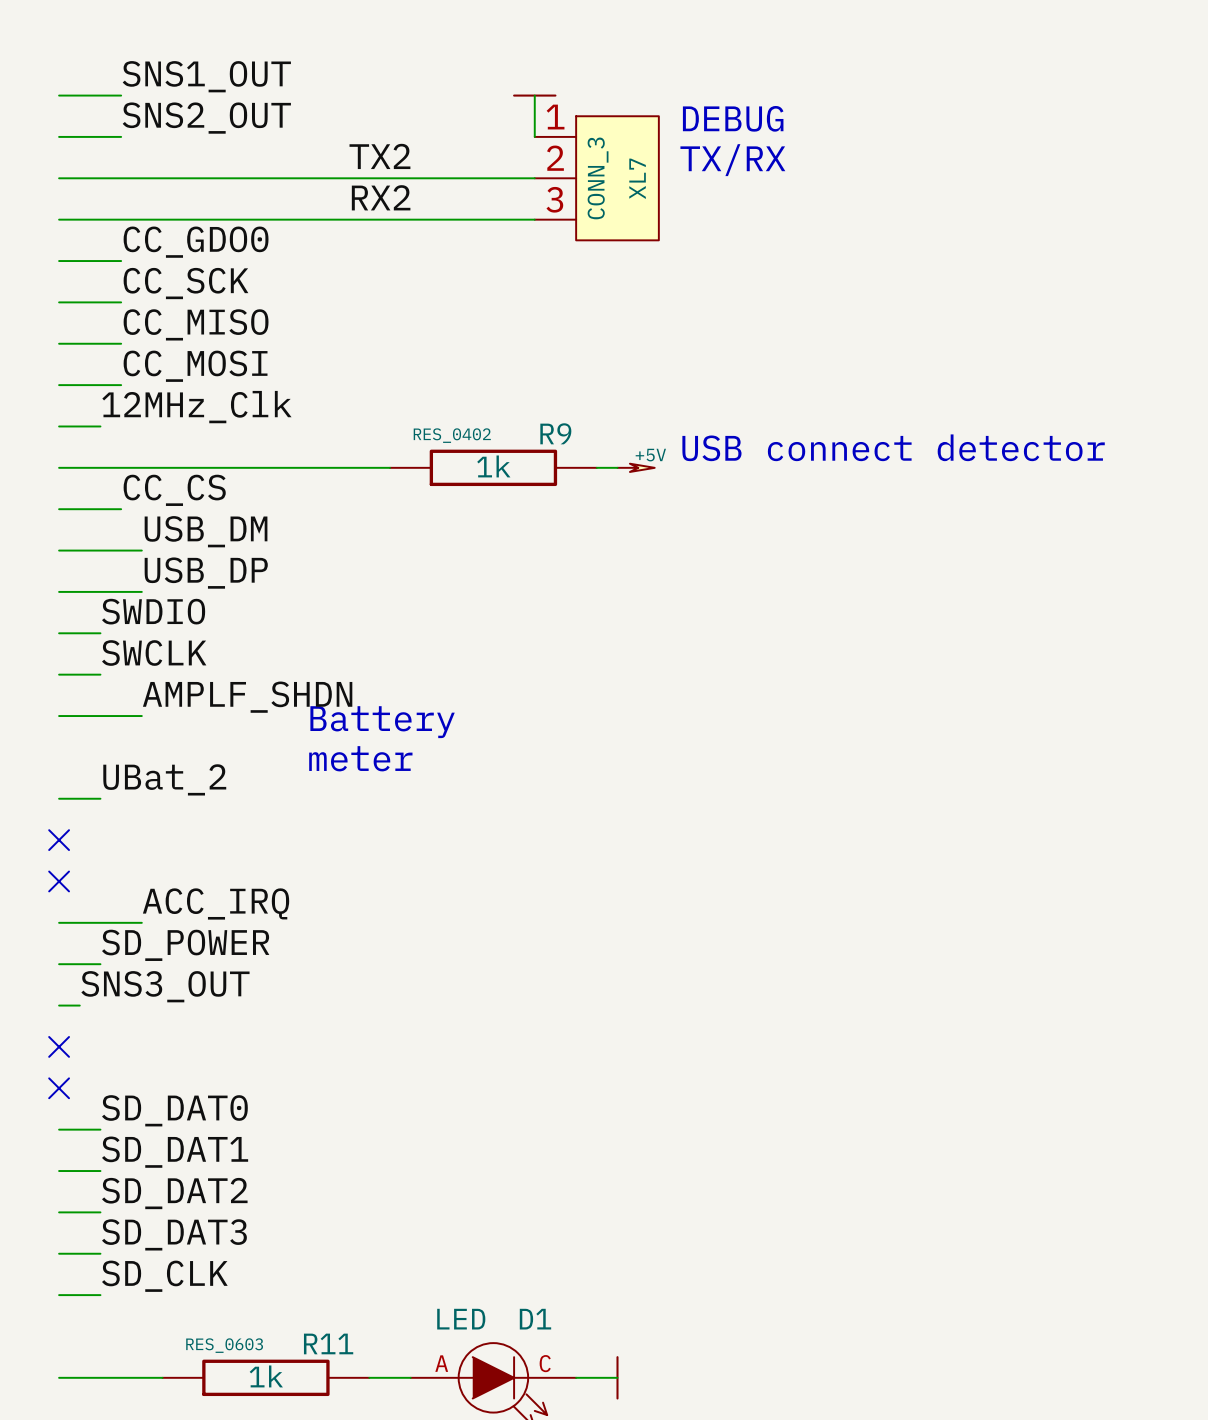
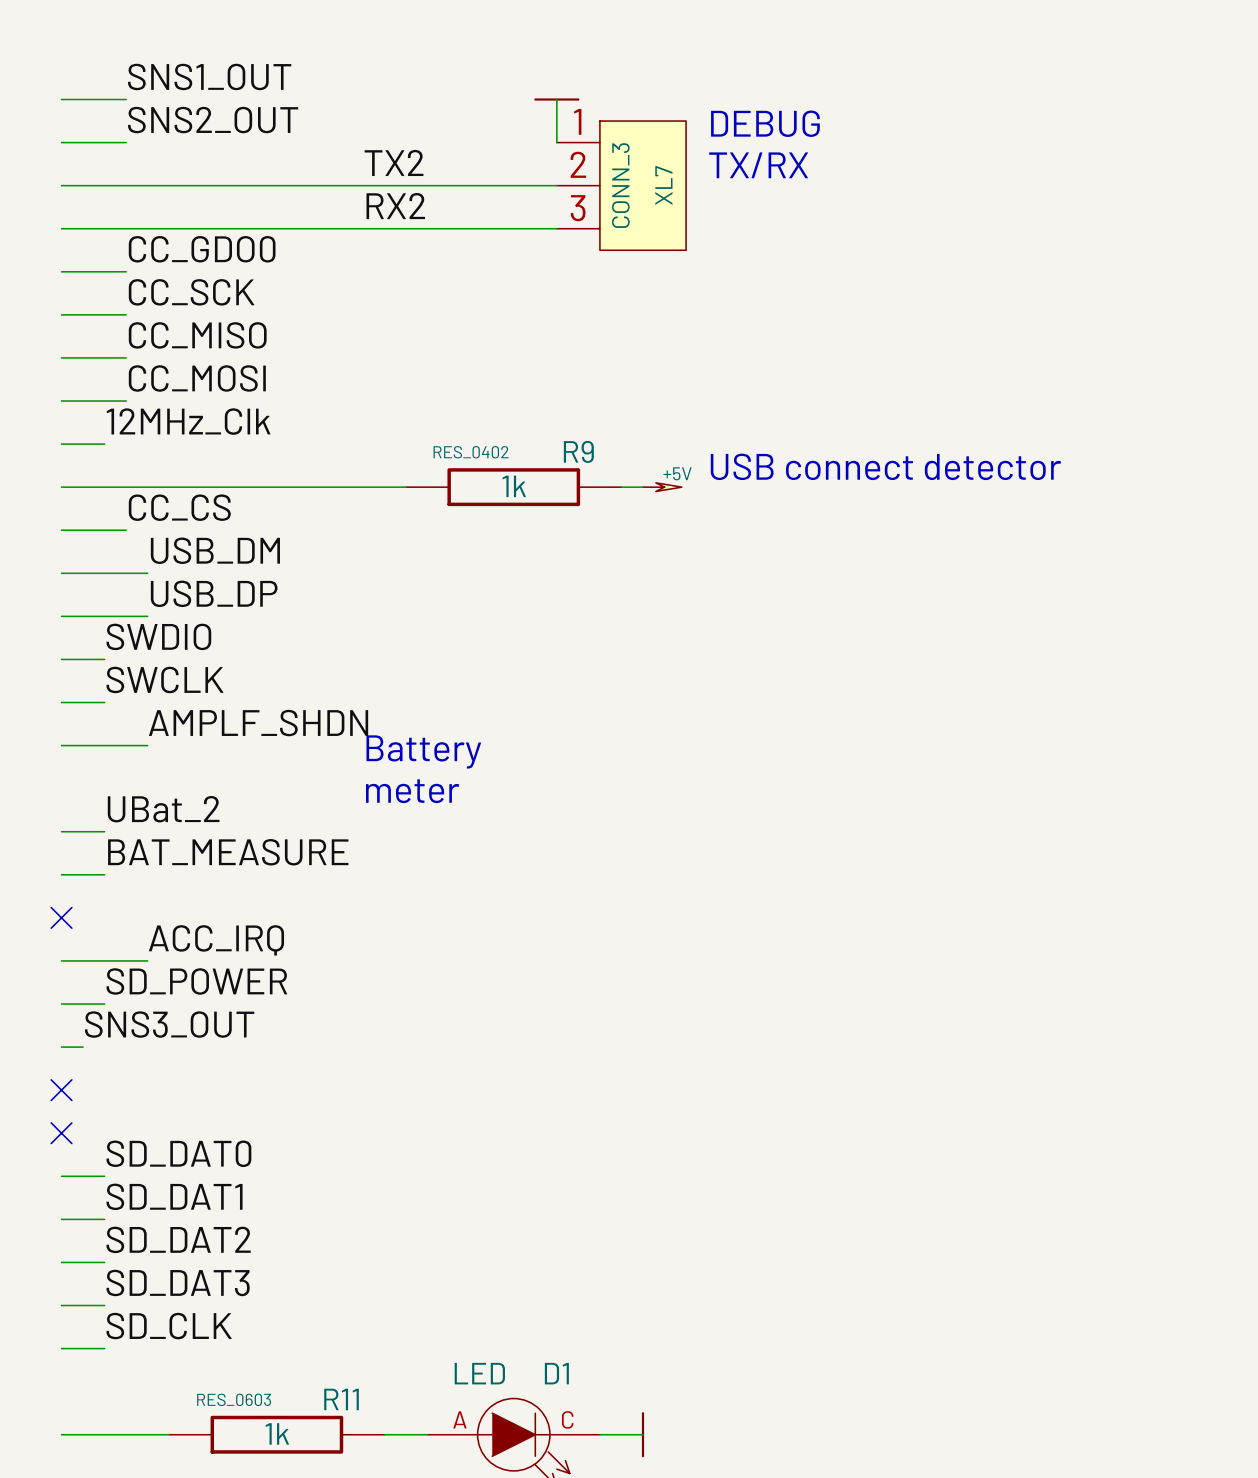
text position: Battery (382, 722) -> Battery (423, 751)
text position: meter (360, 758) -> meter (412, 791)
label: none -> BAT_MEASURE (228, 852)
wire: none -> (61, 874) (104, 874)
no-connect mark: (59, 840) -> none

